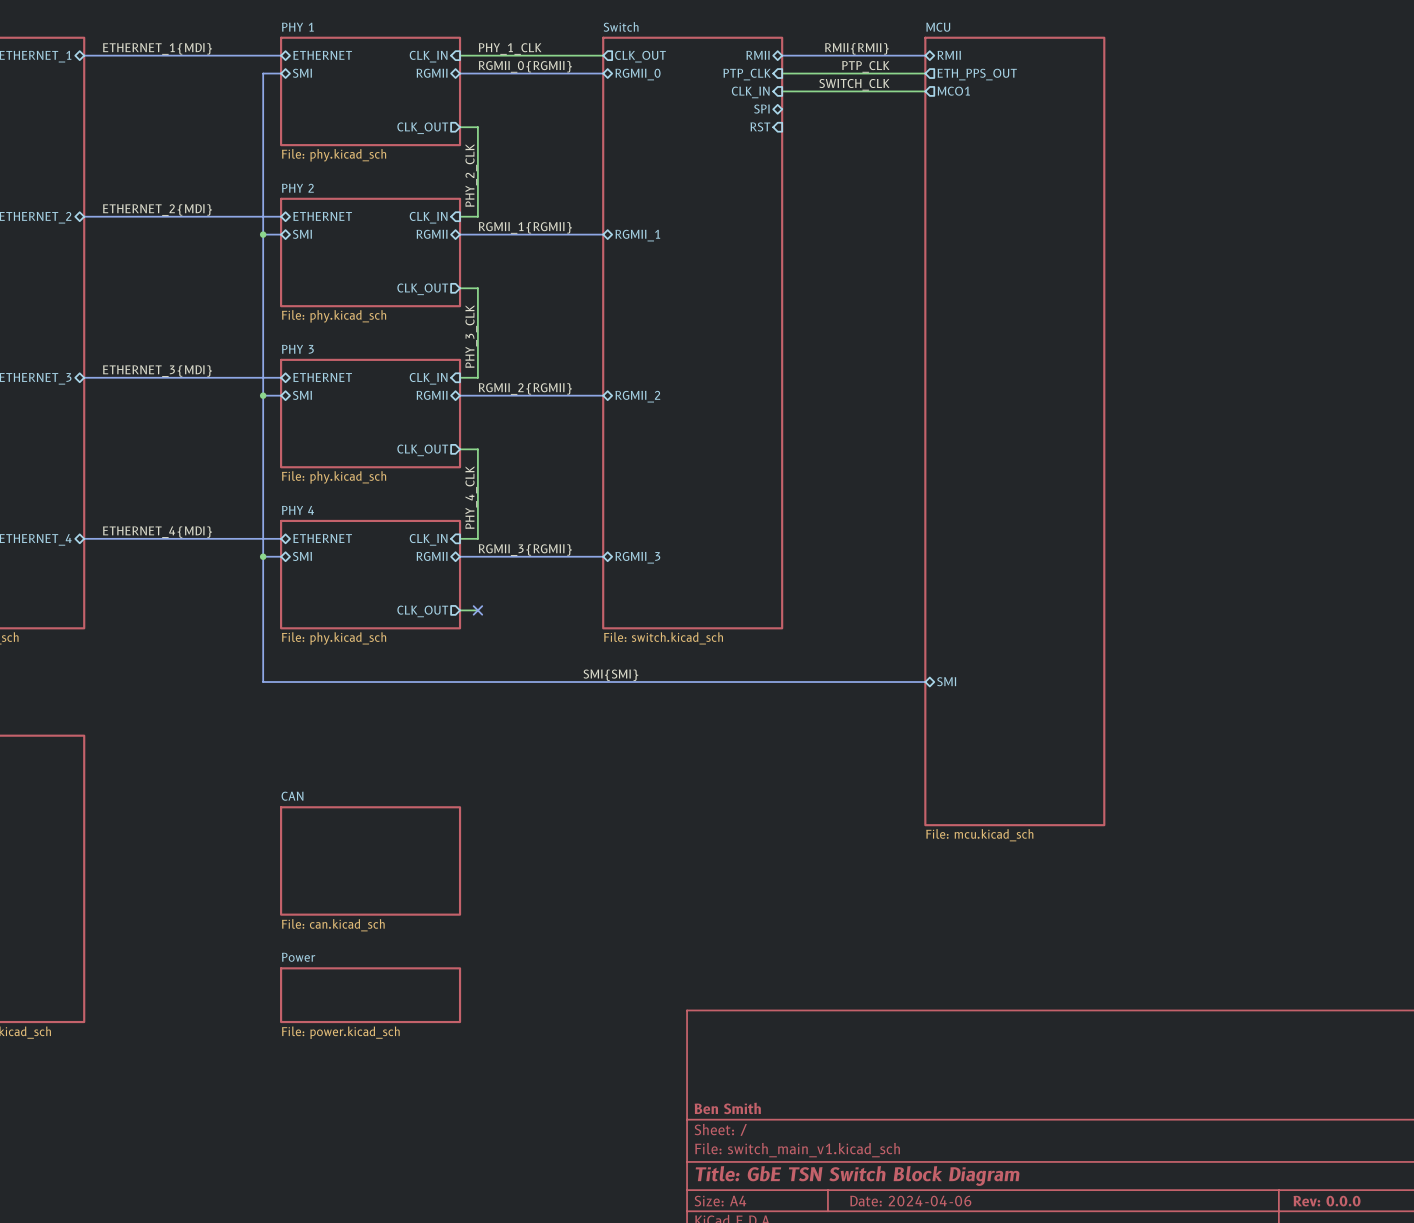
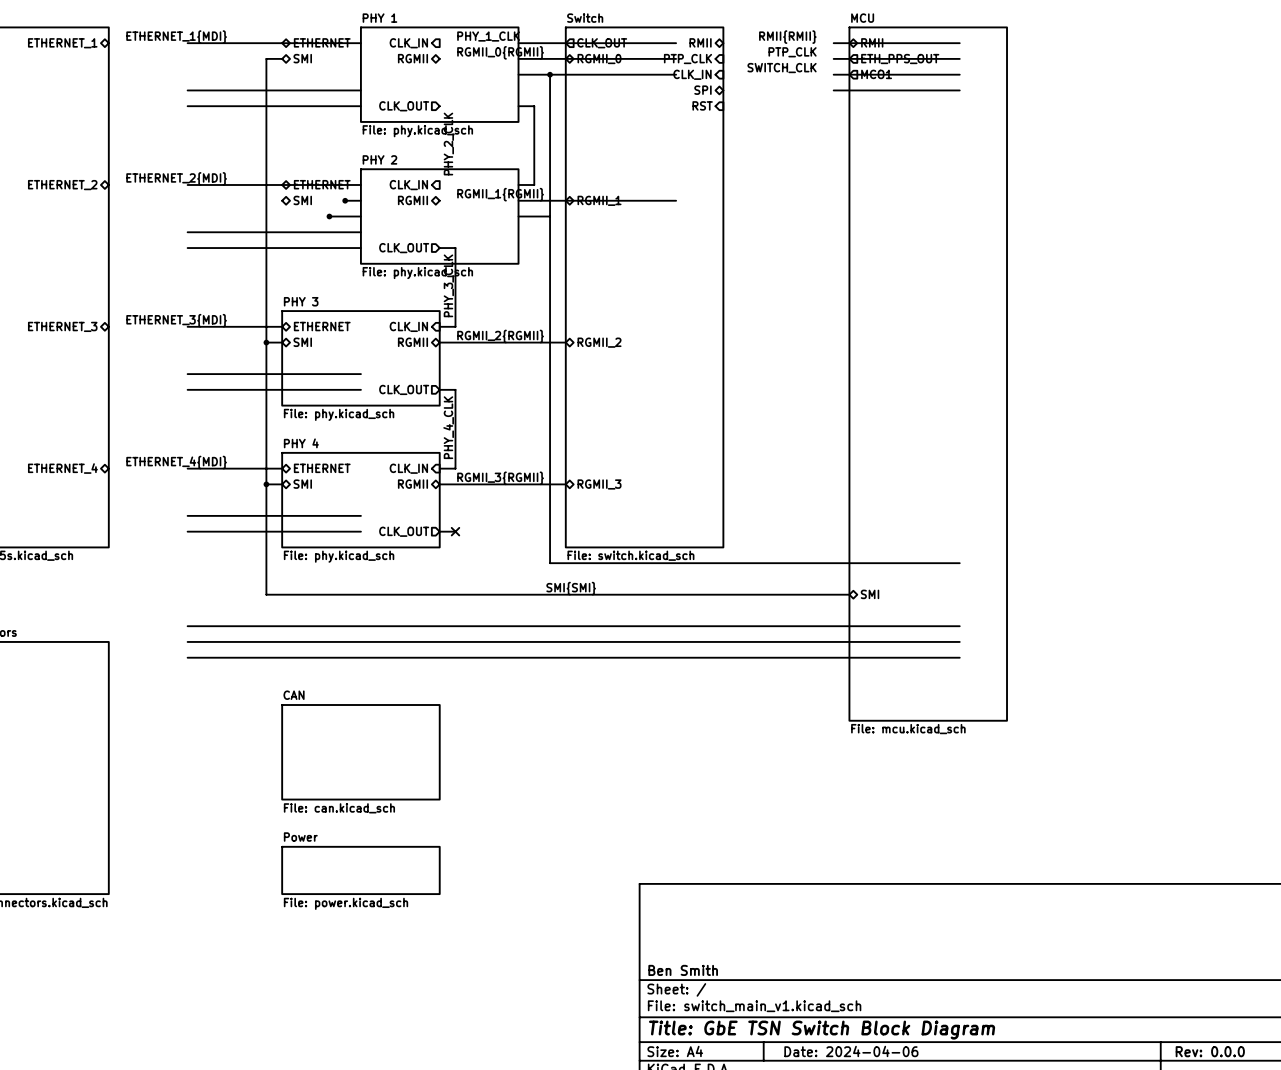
bus: (84, 55) (173, 55) -> none
bus: none -> (282, 43) (360, 43)
wire: (460, 55) (549, 55) -> none
wire: none -> (565, 43) (676, 43)
bus: (782, 55) (907, 55) -> (849, 43) (959, 43)
bus: (460, 73) (549, 73) -> none
bus: none -> (565, 58) (676, 58)
wire: (782, 73) (907, 73) -> (849, 58) (959, 58)
sheet PHY 1 position: (370, 91) -> (439, 74)
wire: none -> (518, 74) (676, 74)
wire: none -> (550, 74) (550, 563) (959, 563)
junction: none -> (550, 74)
wire: (782, 91) (907, 91) -> (849, 74) (959, 74)
wire: none -> (187, 90) (360, 90)
bus: none -> (833, 90) (959, 90)
wire: none -> (187, 106) (360, 106)
wire: (460, 127) (477, 127) (477, 216) (460, 216) -> (518, 106) (534, 106) (534, 184) (518, 184)
bus: (84, 216) (173, 216) -> none
bus: none -> (282, 184) (360, 184)
bus: (263, 234) (281, 234) -> (345, 200) (360, 200)
junction: (263, 234) -> none
junction: none -> (345, 200)
bus: (460, 234) (549, 234) -> none
bus: none -> (565, 200) (676, 200)
wire: none -> (329, 216) (360, 216)
junction: none -> (329, 216)
sheet PHY 2 position: (370, 252) -> (439, 216)
wire: none -> (518, 216) (550, 216)
wire: none -> (187, 232) (360, 232)
wire: none -> (187, 248) (360, 248)
bus: (84, 377) (173, 377) -> none
wire: none -> (187, 374) (360, 374)
wire: none -> (187, 389) (360, 389)
bus: (84, 538) (173, 538) -> none
wire: none -> (187, 515) (360, 515)
wire: none -> (187, 531) (360, 531)
bus: none -> (187, 626) (959, 626)
bus: none -> (187, 641) (959, 641)
wire: none -> (187, 657) (959, 657)

